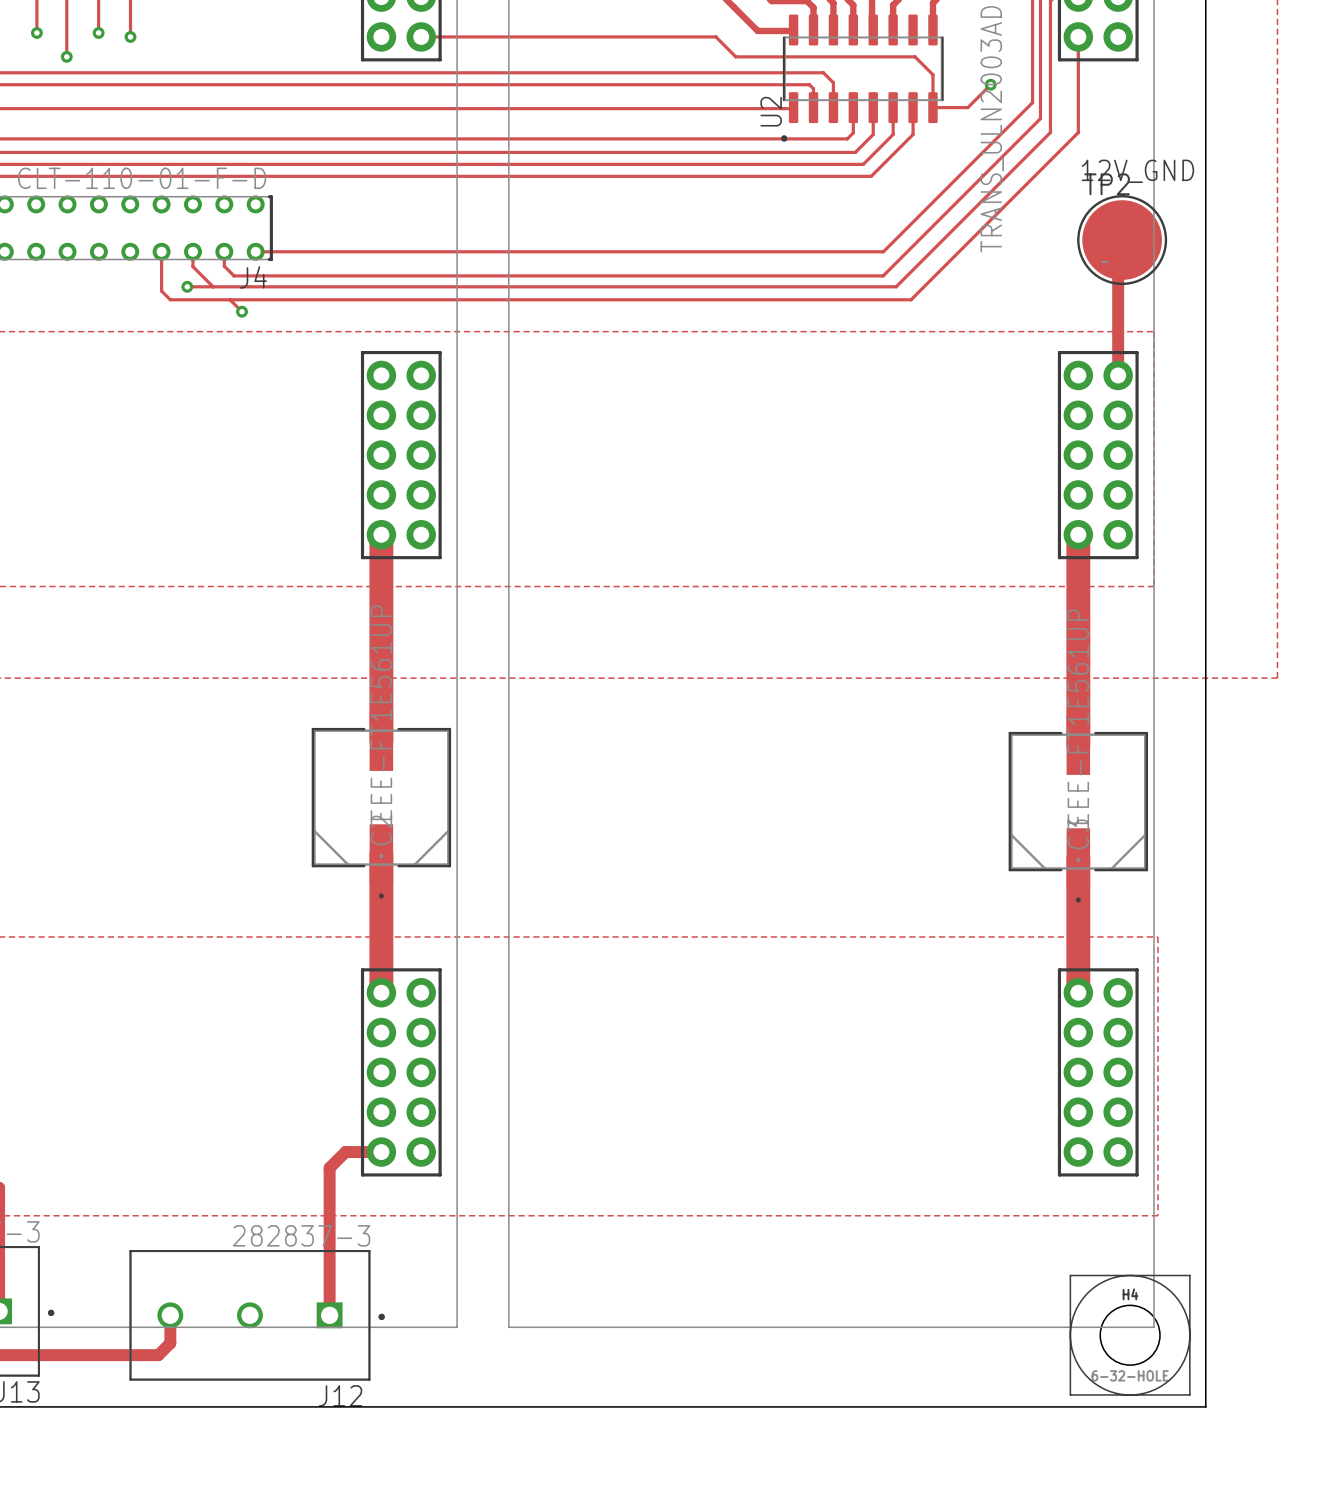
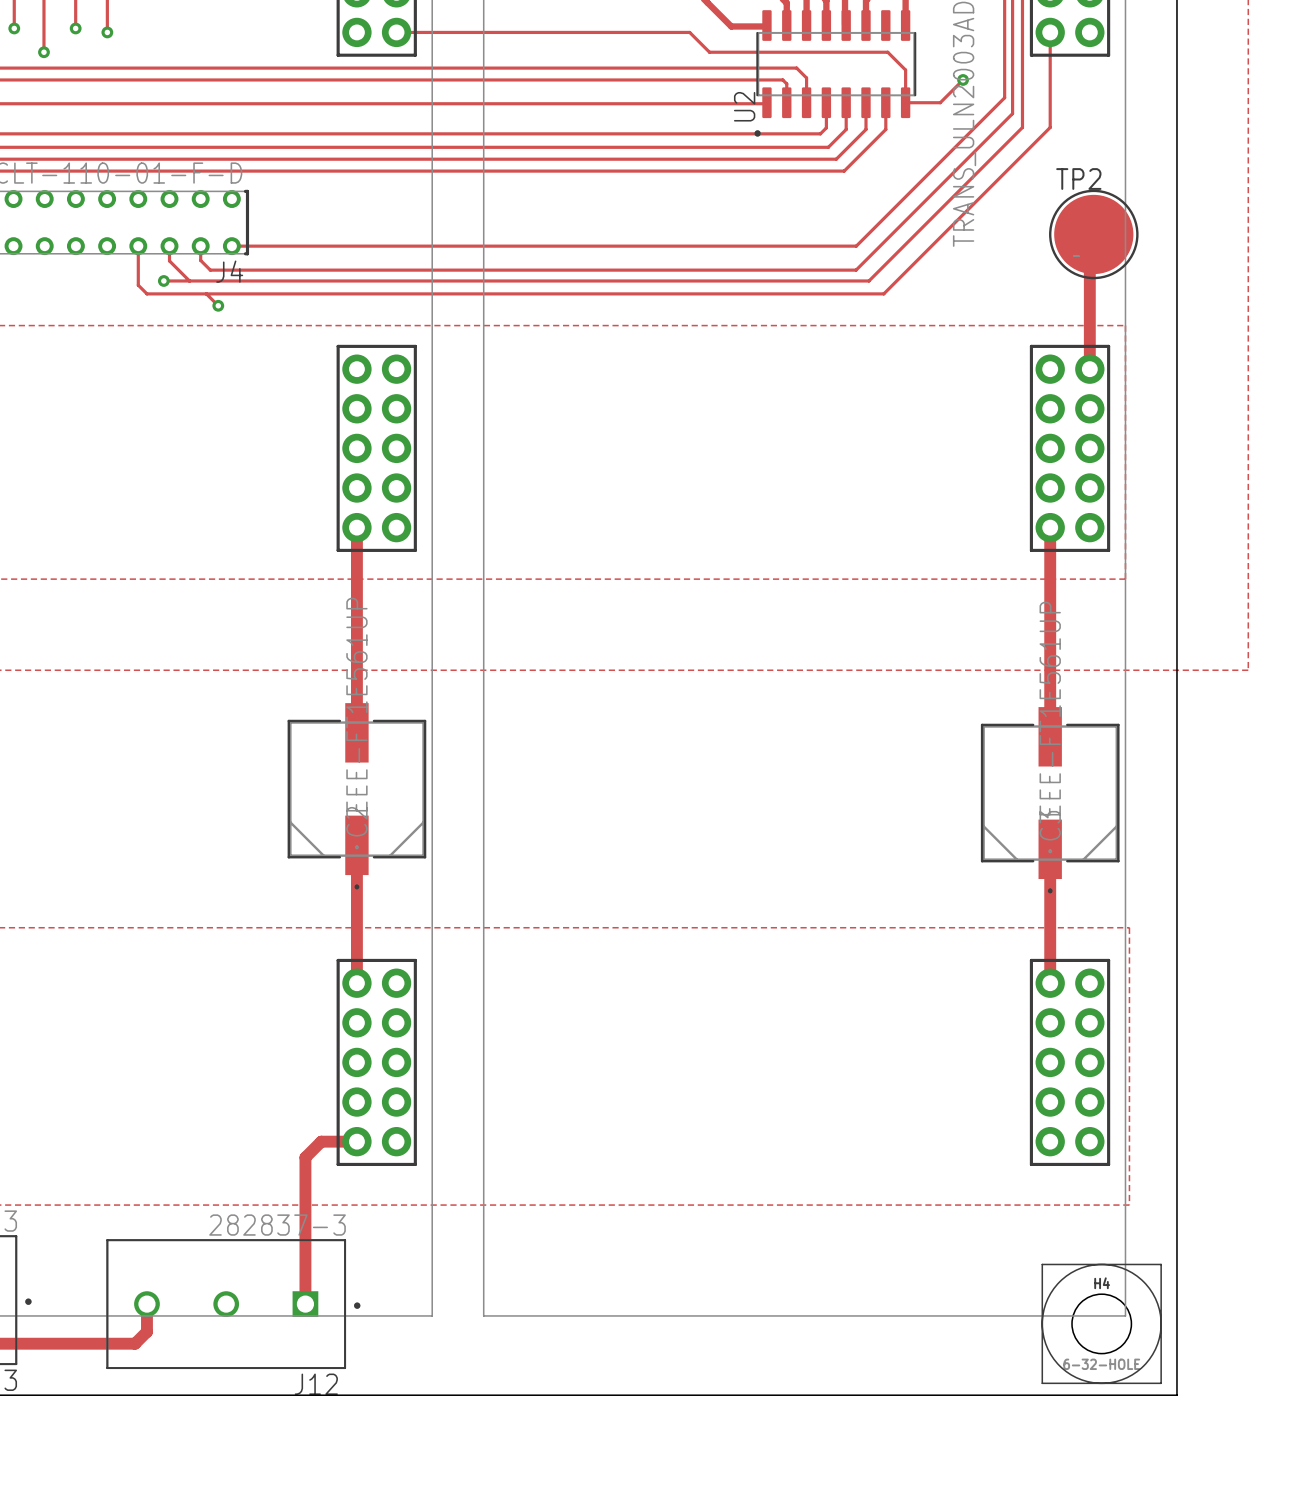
text: 12V_GND (1137, 171) -> none
track width: thick (381, 534) (381, 741) -> thin (356, 527) (356, 732)
track width: thick (1078, 534) (1078, 745) -> thin (1050, 527) (1050, 736)
track width: thick (381, 854) (381, 992) -> thin (356, 845) (356, 983)
track width: thick (1078, 858) (1078, 992) -> thin (1050, 849) (1050, 983)

